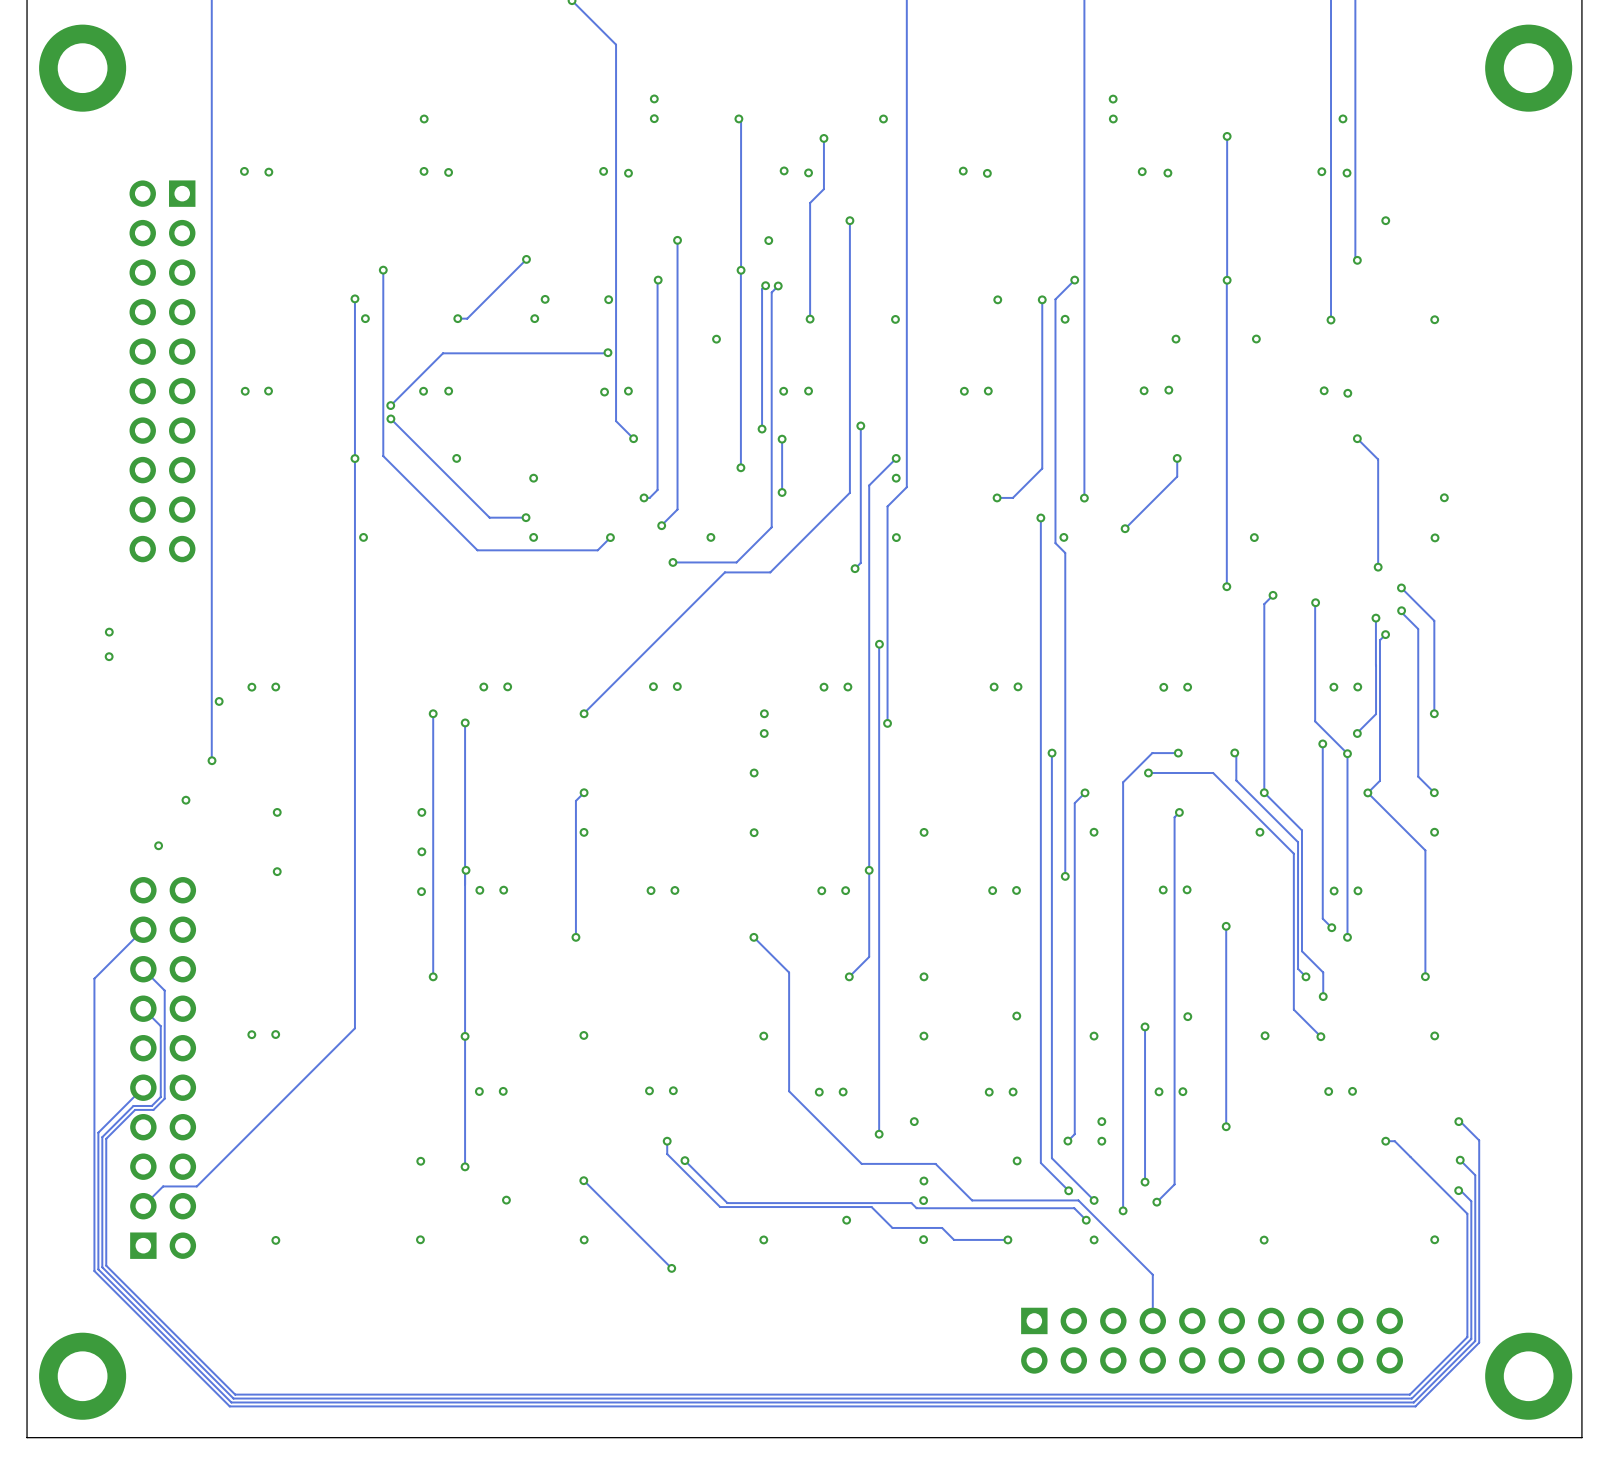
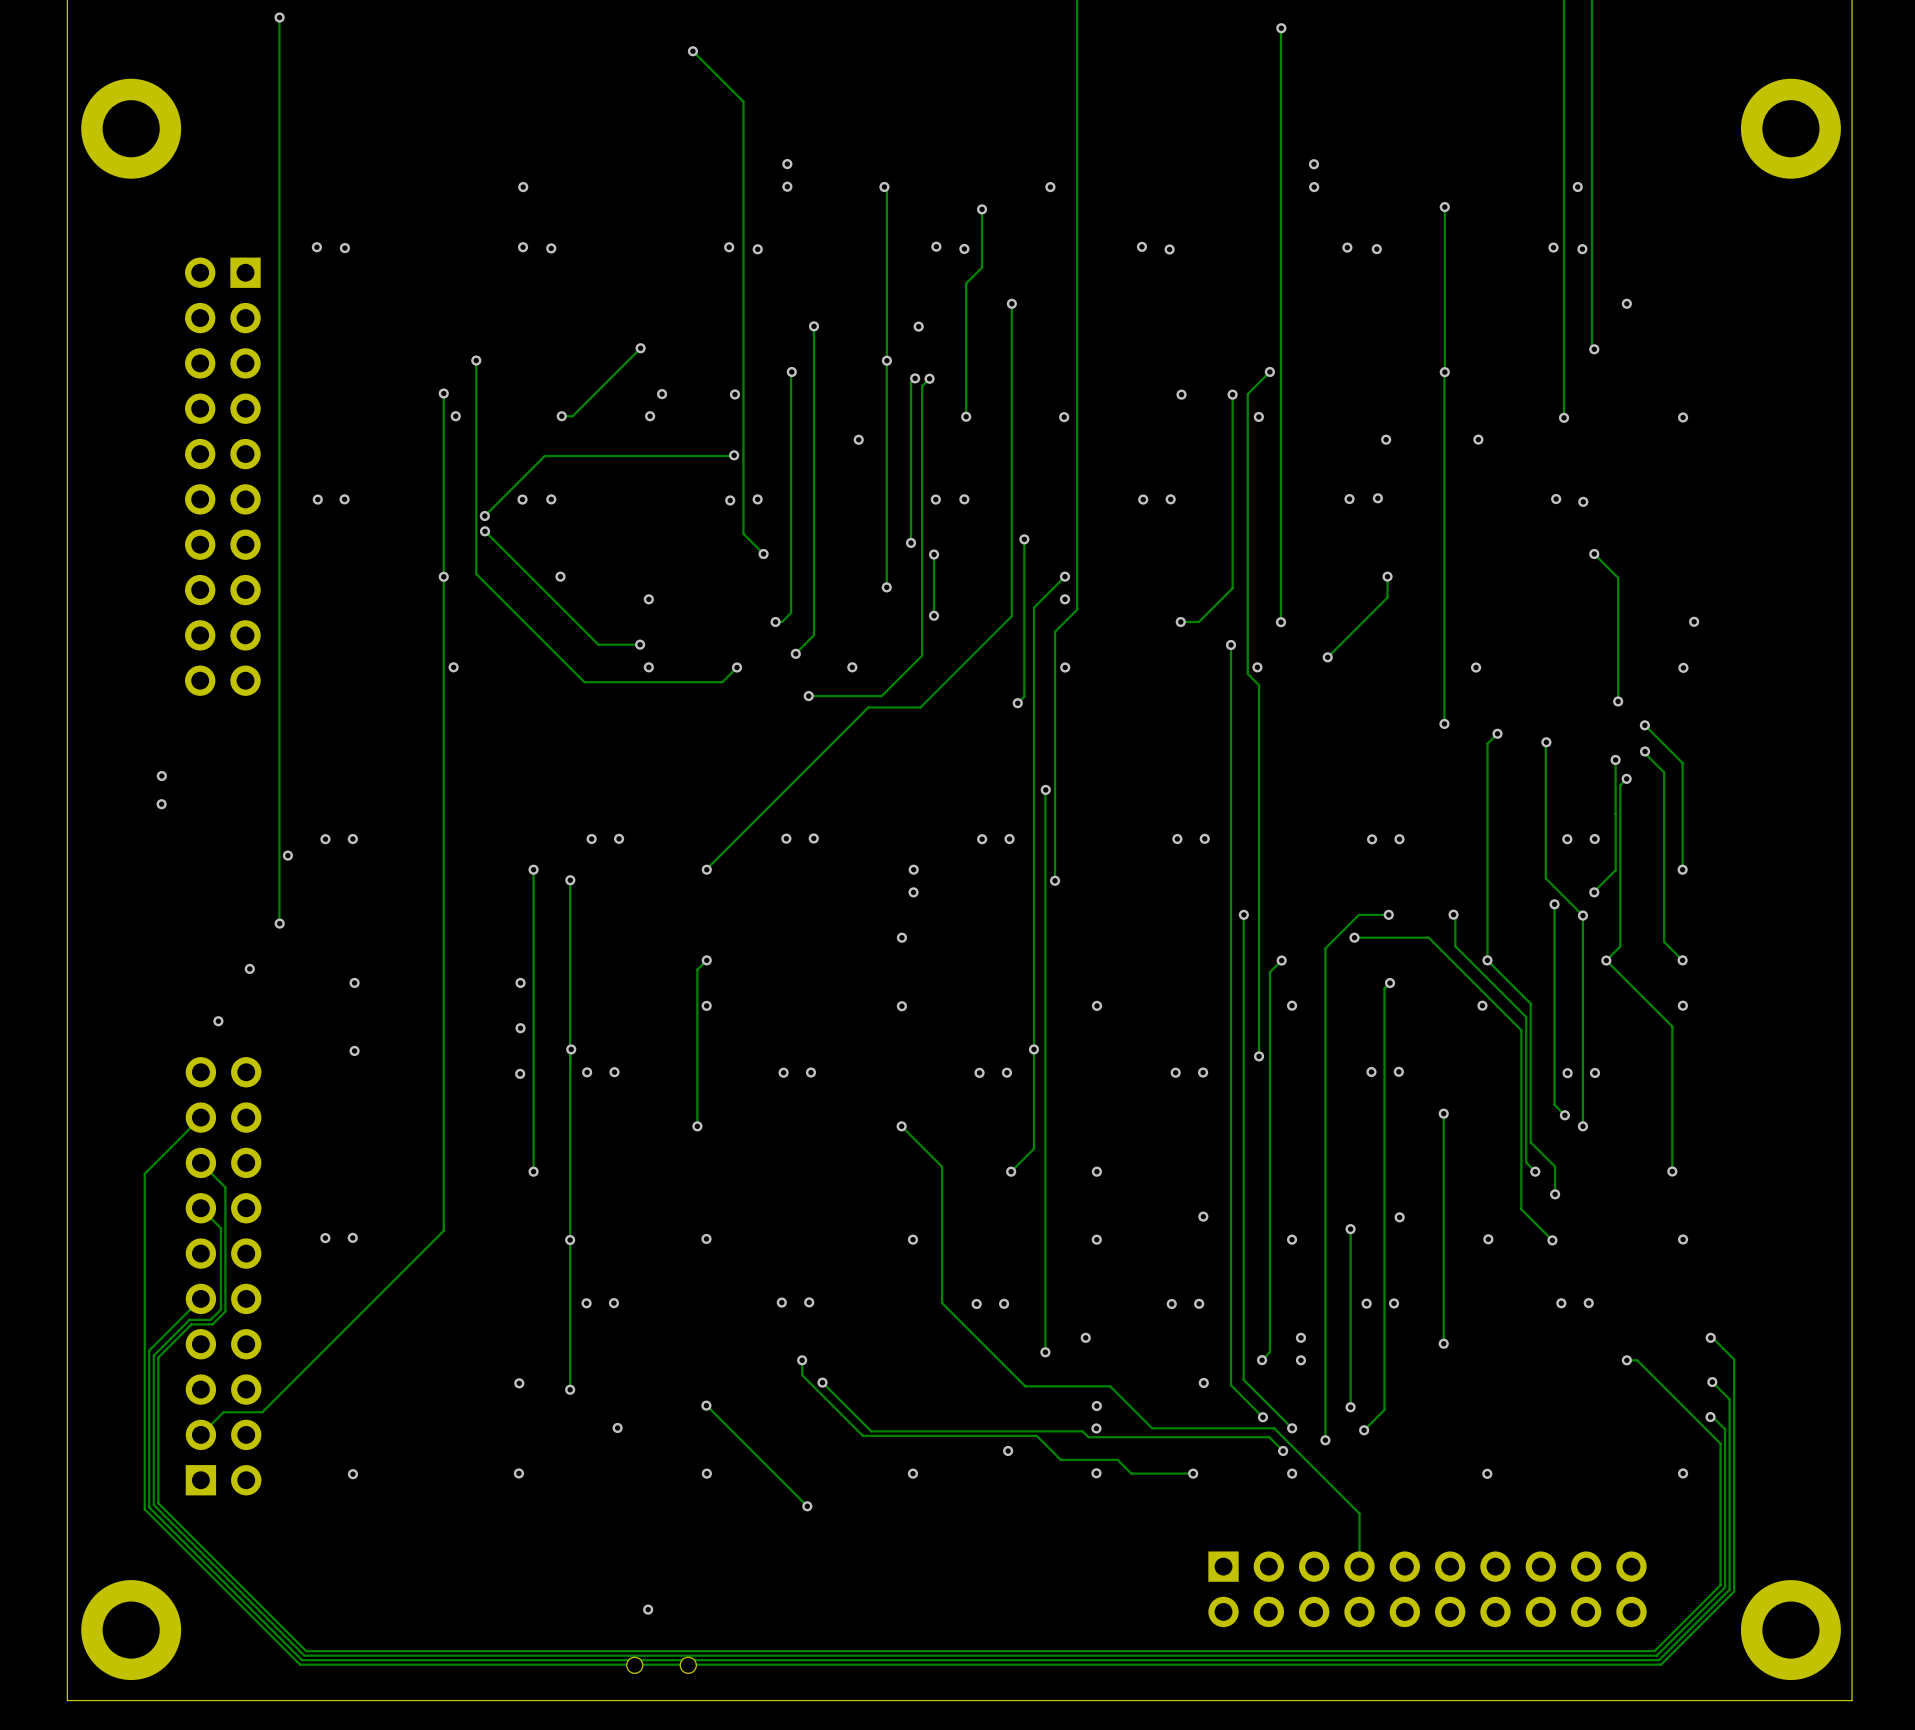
via: none -> (648, 1609)
part: none -> (661, 1665)

